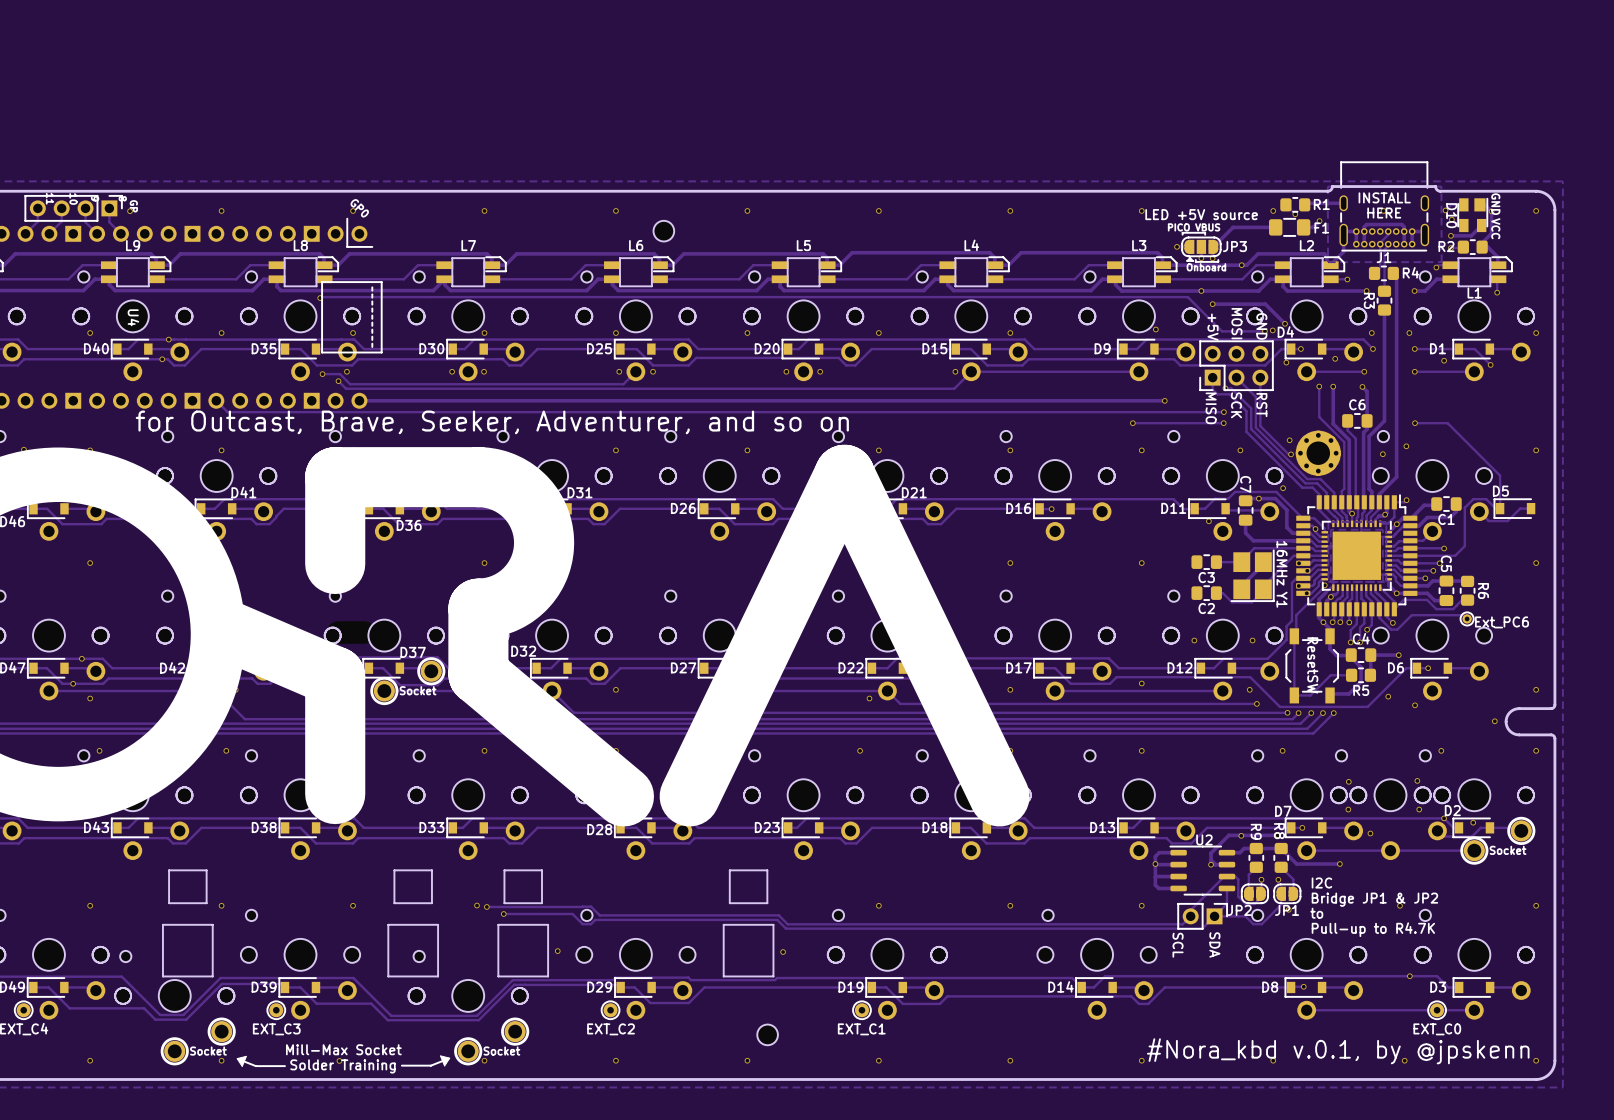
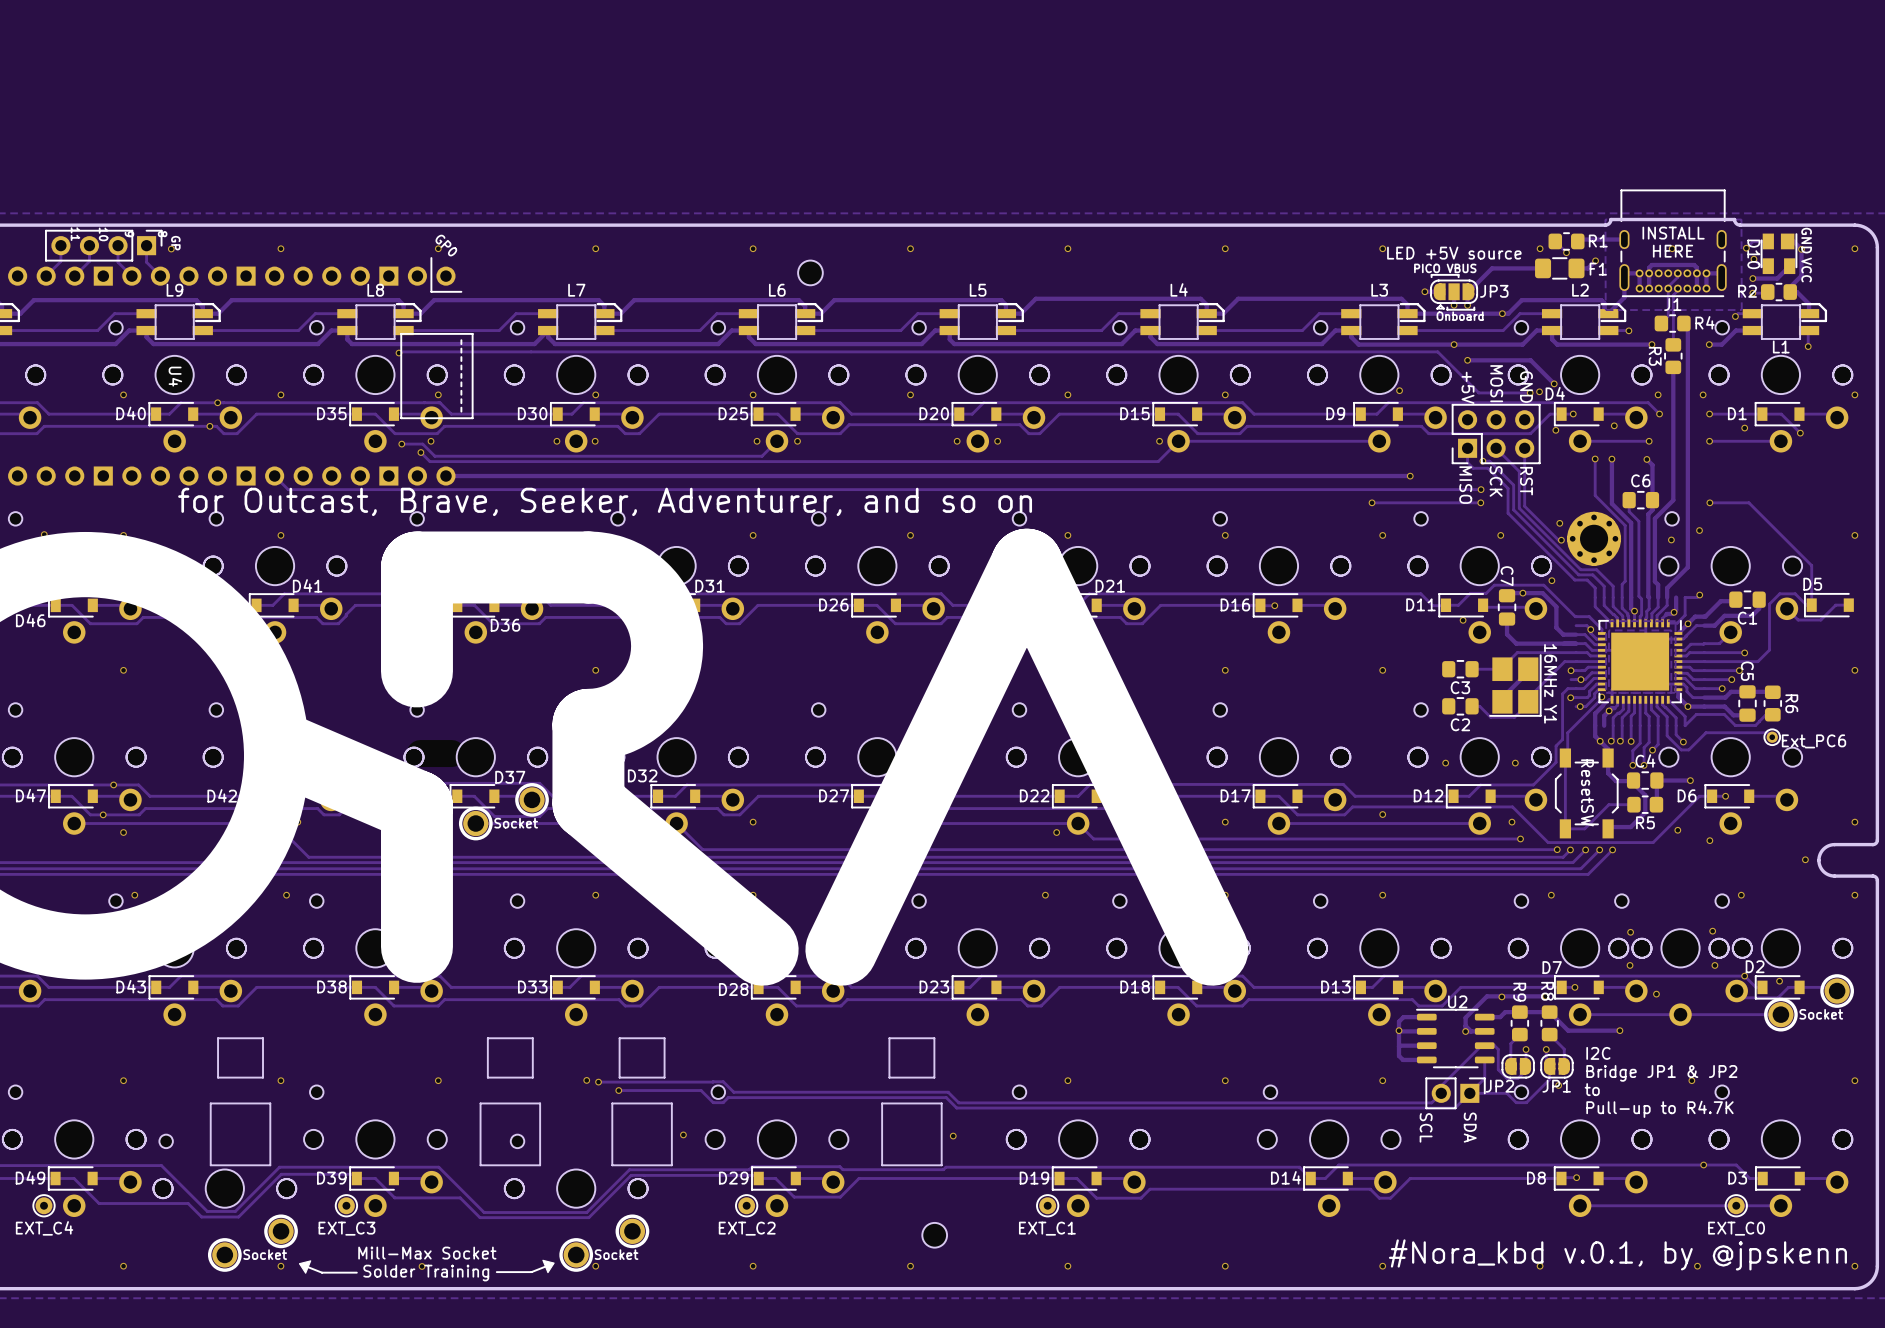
part: (1356, 555) -> none

